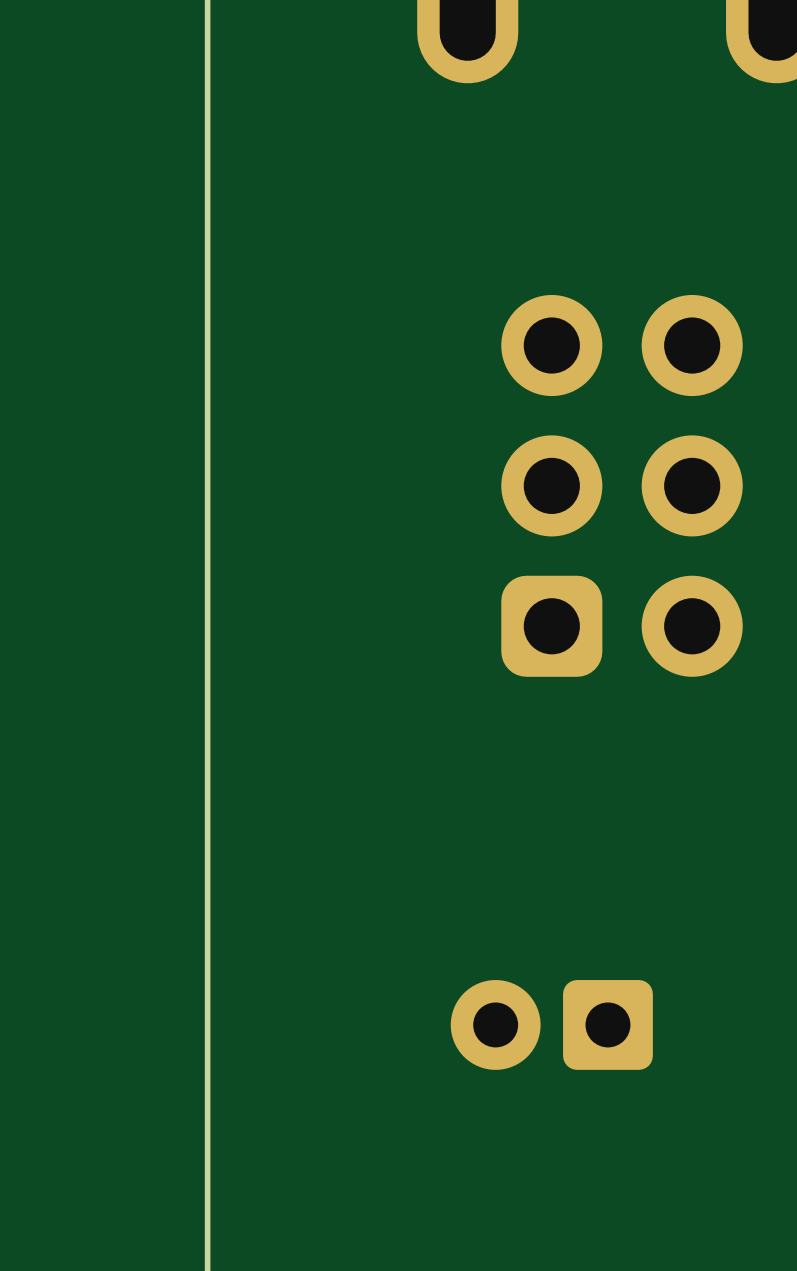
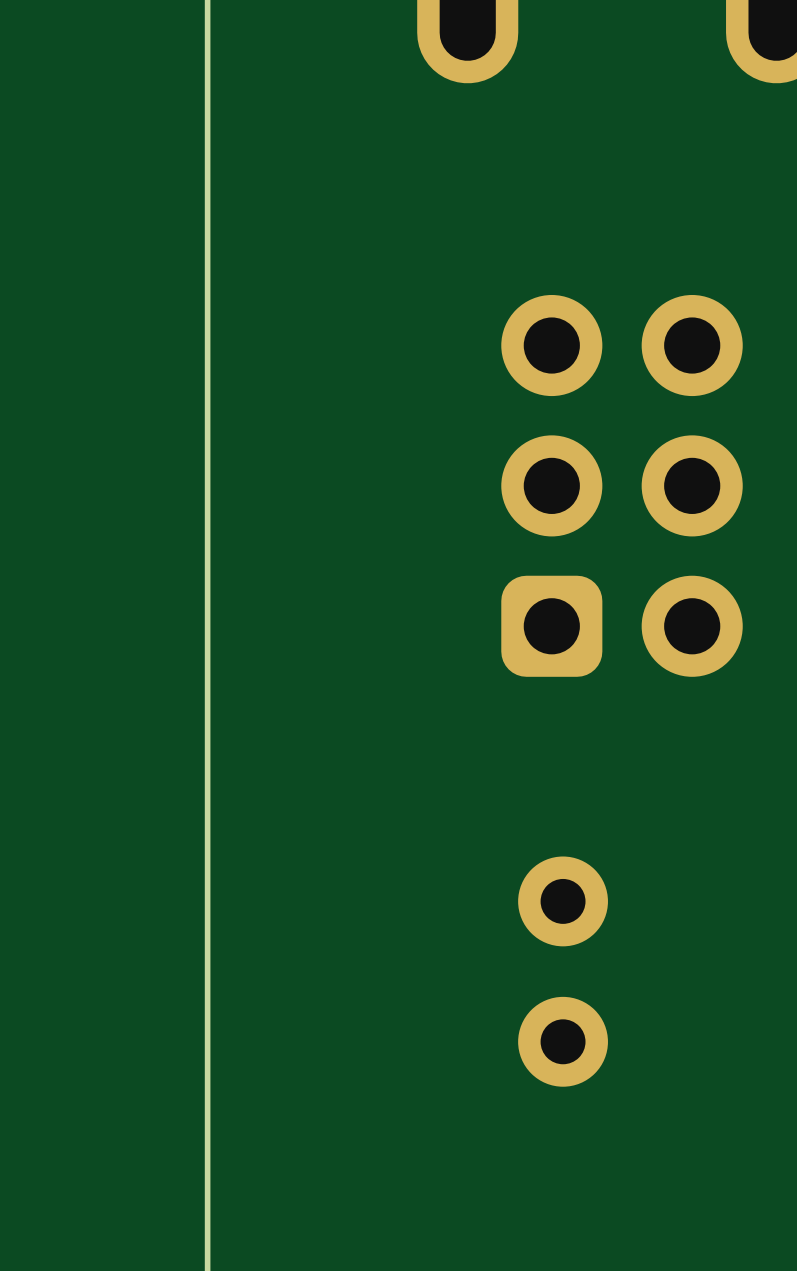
part footprint: [450, 980, 653, 1070] -> [518, 856, 608, 1087]

